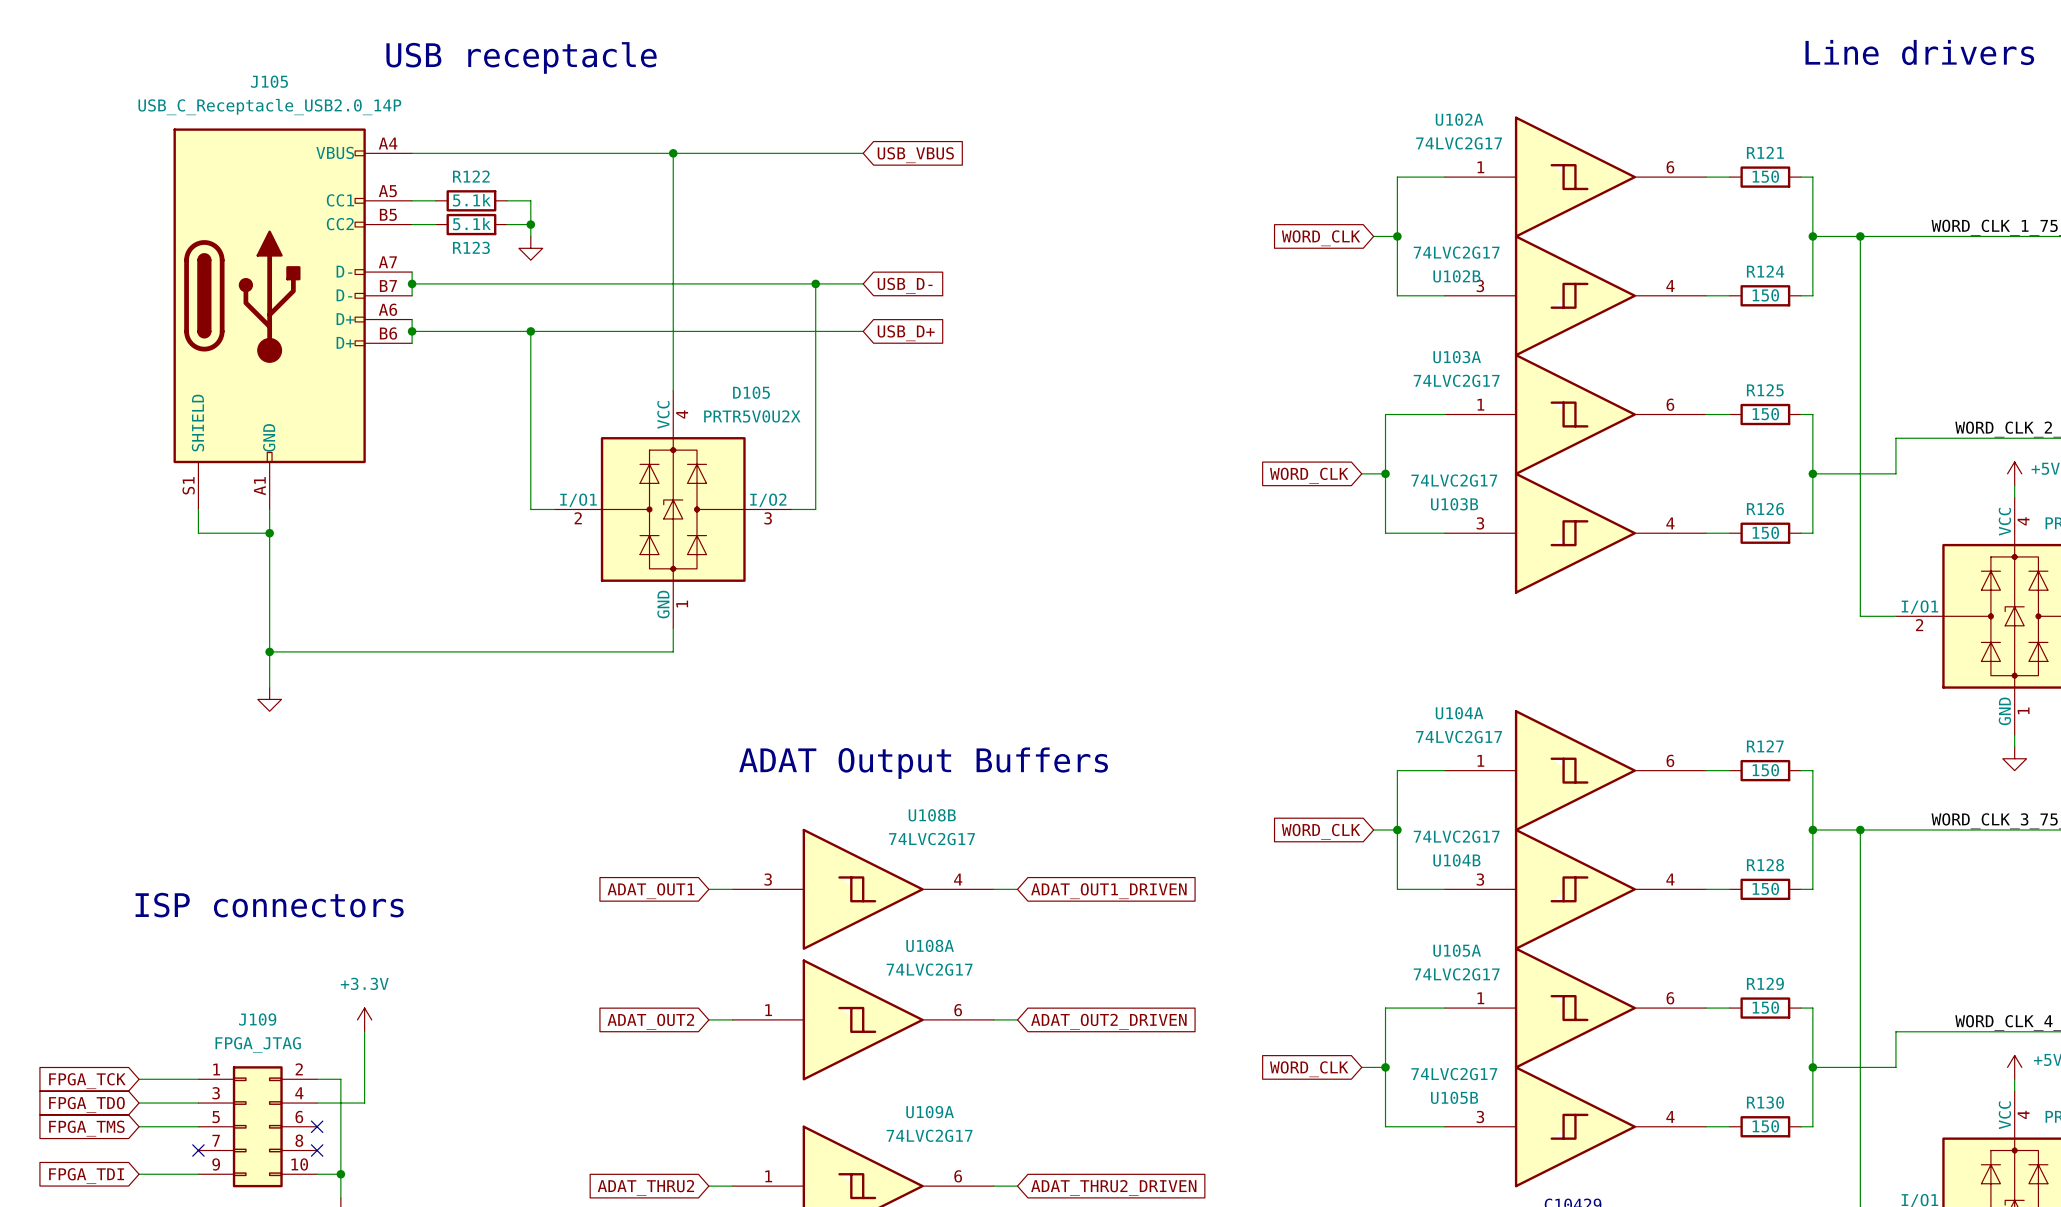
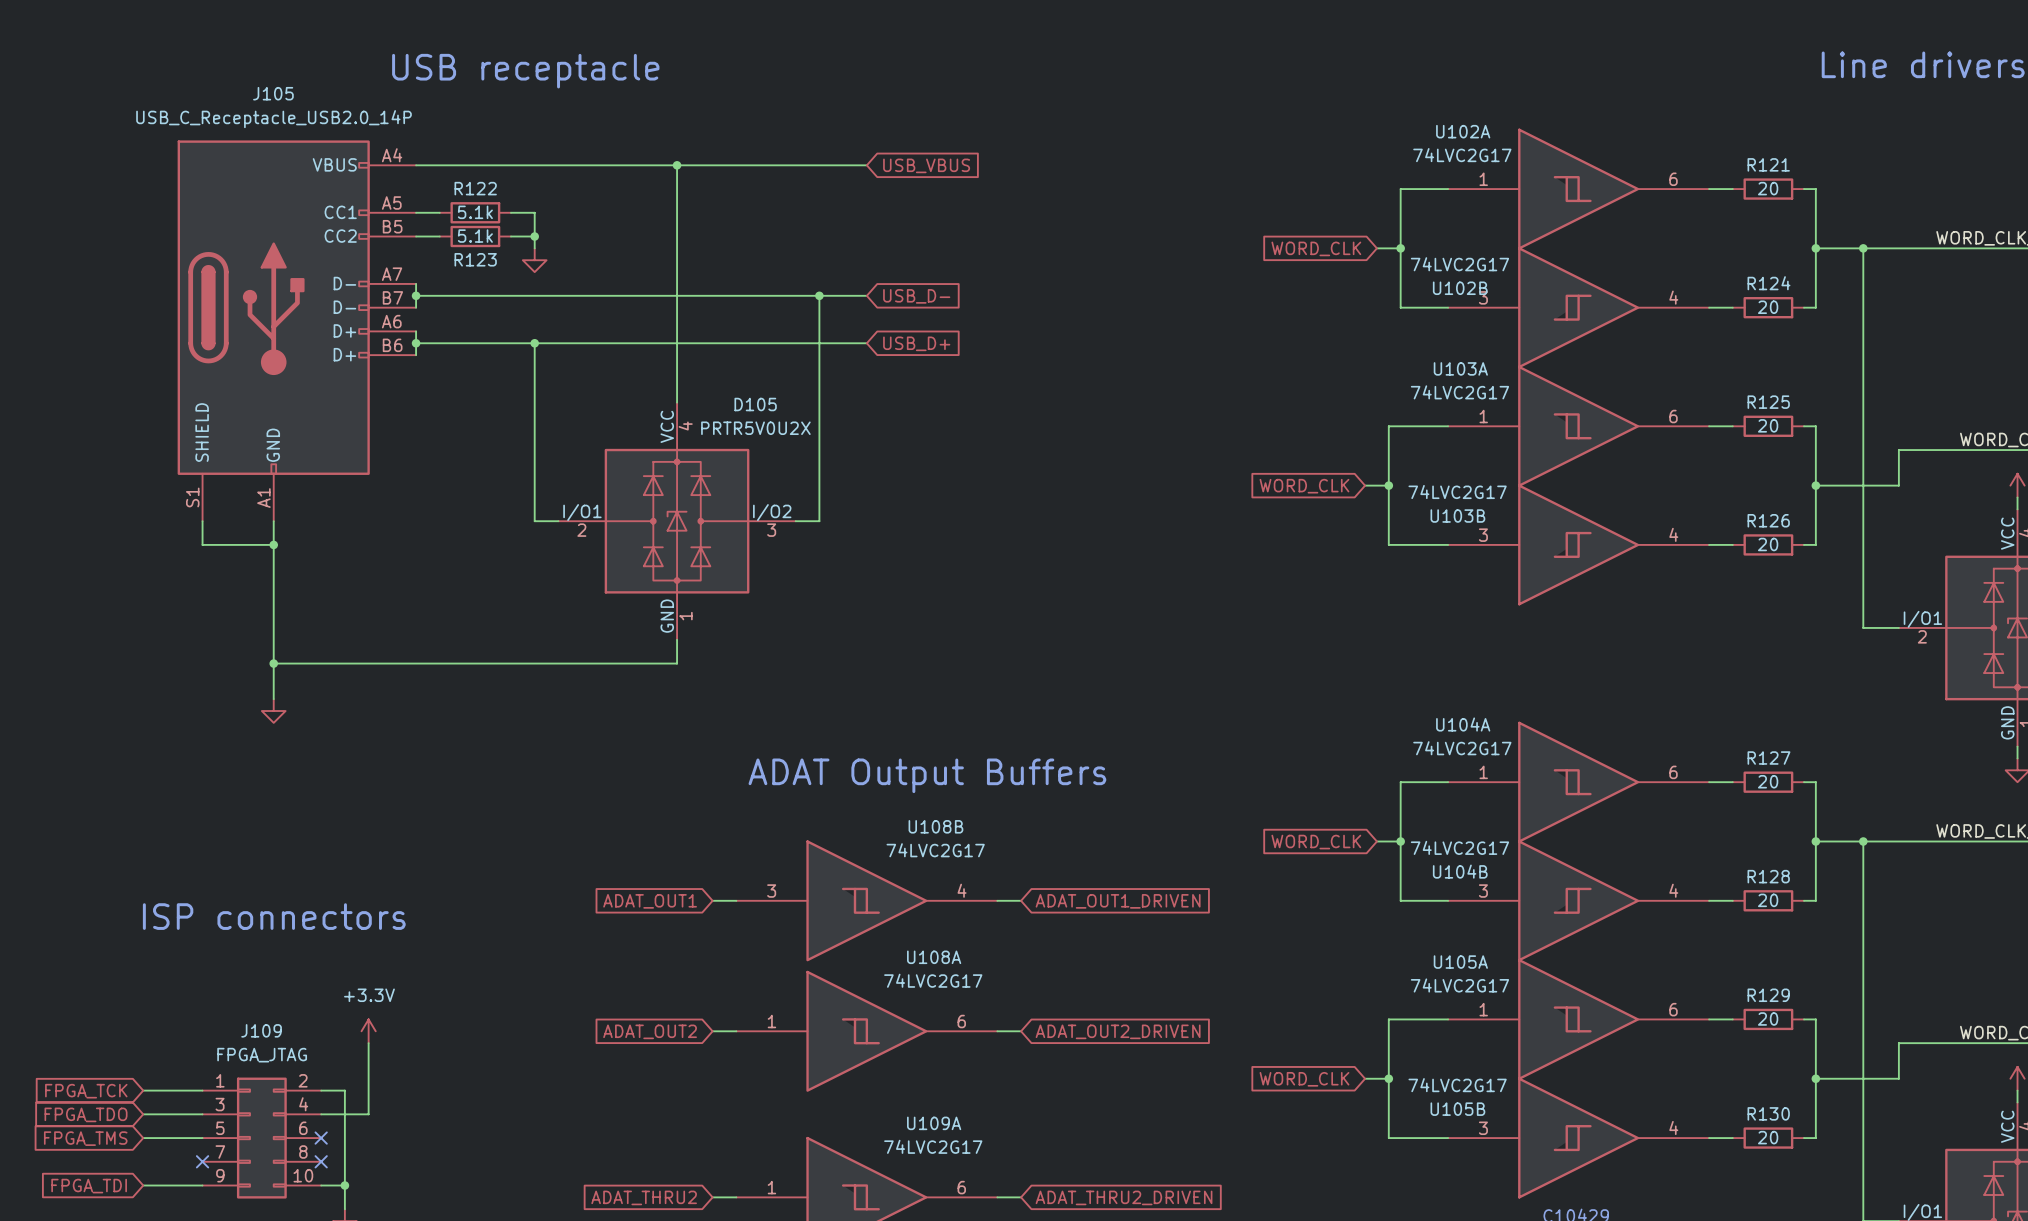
R121 value: 150 (1765, 176) -> 20 (1768, 188)
R124 value: 150 (1765, 295) -> 20 (1768, 307)
R125 value: 150 (1765, 414) -> 20 (1768, 425)
R126 value: 150 (1765, 532) -> 20 (1768, 544)
R127 value: 150 (1765, 770) -> 20 (1768, 781)
R128 value: 150 (1765, 888) -> 20 (1768, 900)
R129 value: 150 (1765, 1007) -> 20 (1768, 1018)
R130 value: 150 (1765, 1126) -> 20 (1768, 1137)

